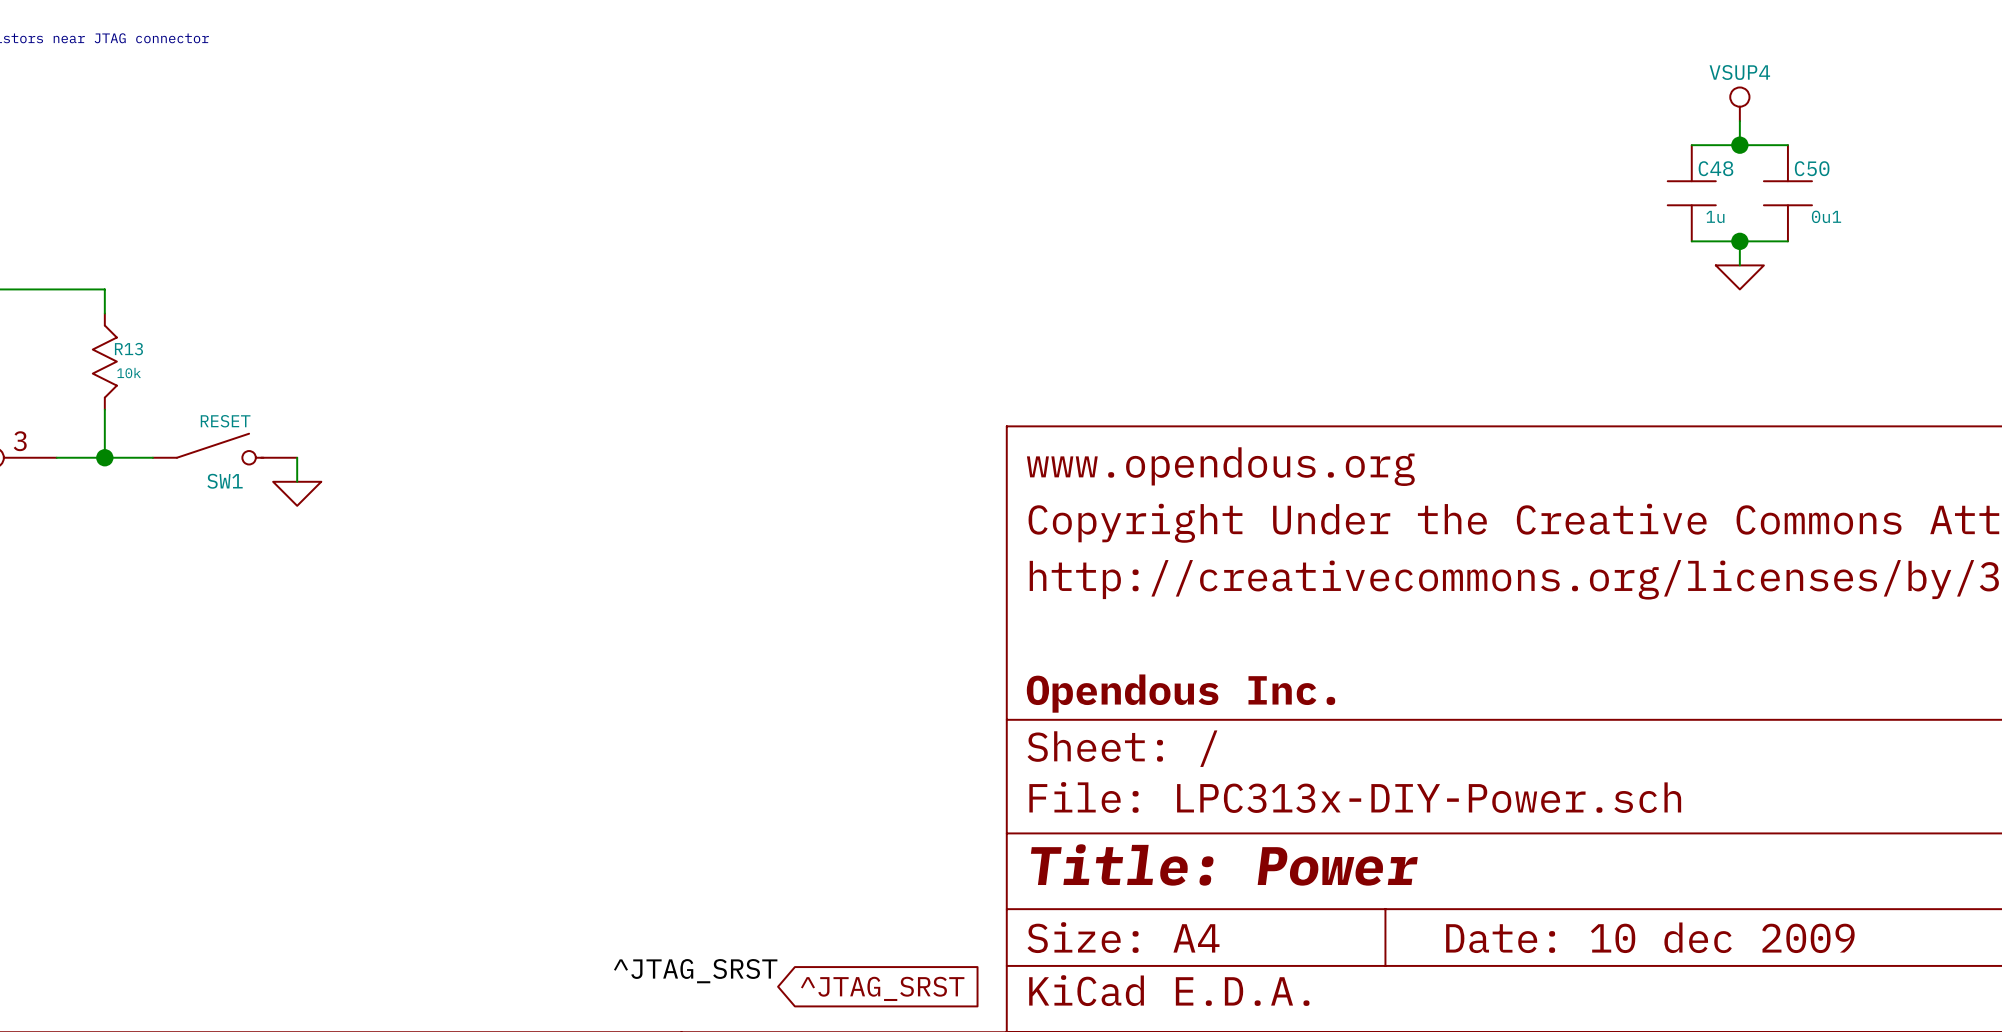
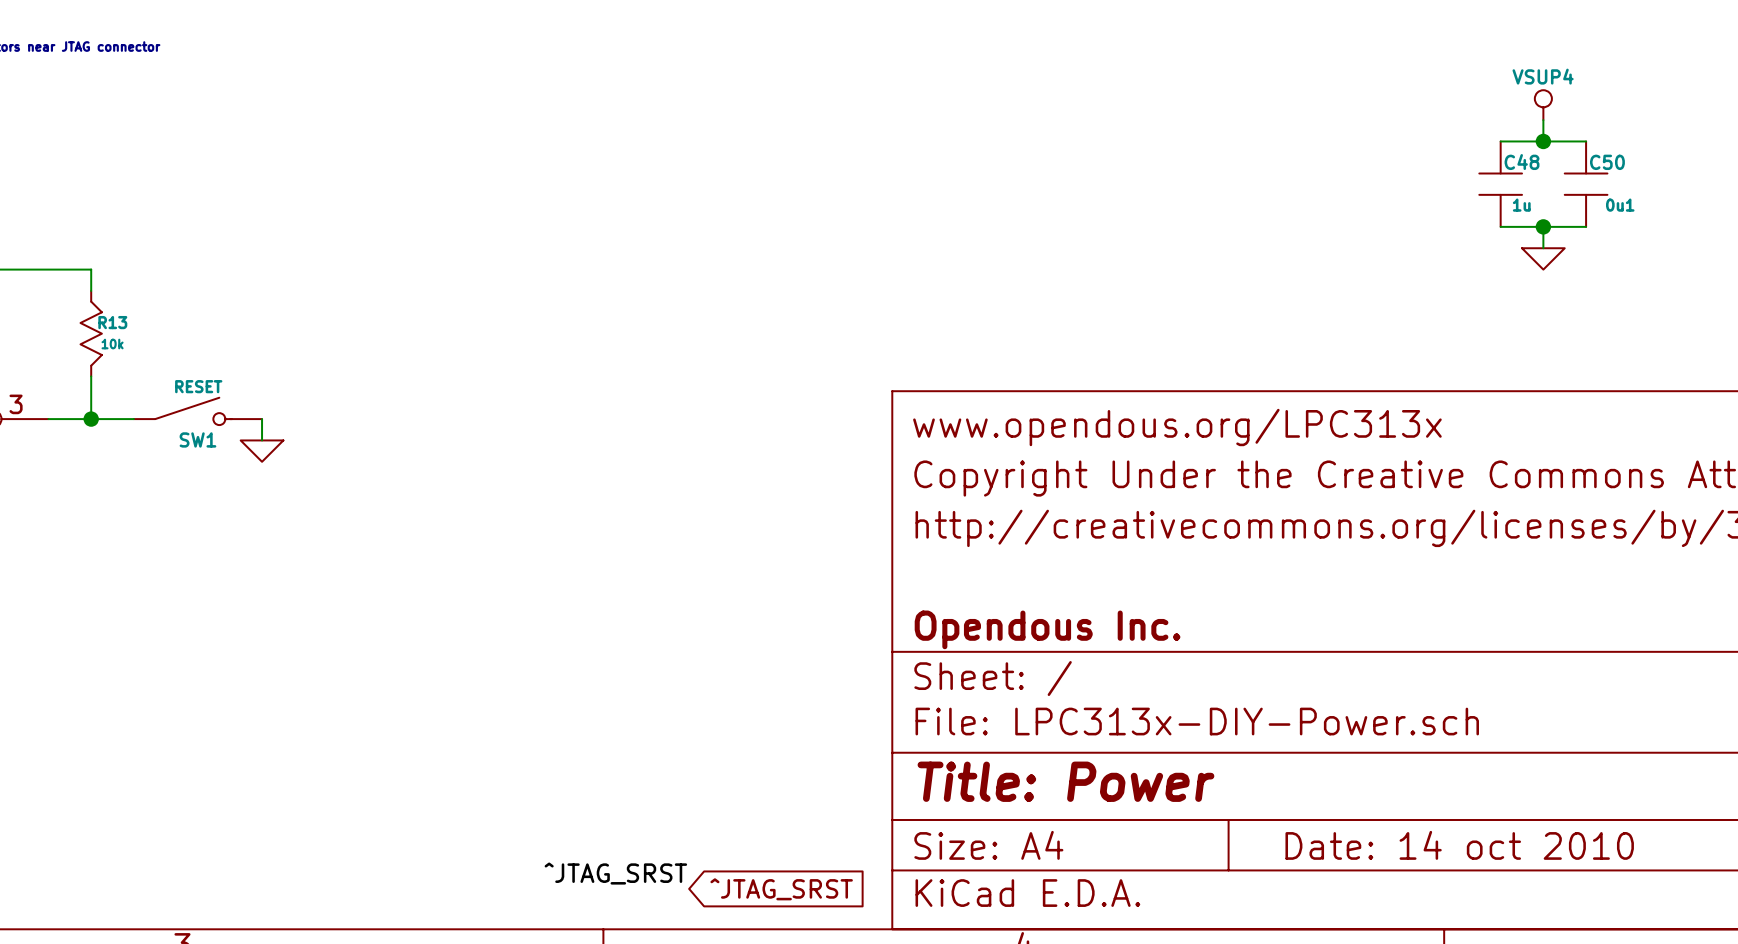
title block: www.opendous.org (1220, 466) -> www.opendous.org/LPC313x (1177, 427)
title block: Date: 10 dec 2009 (1650, 937) -> Date: 14 oct 2010 (1459, 845)

